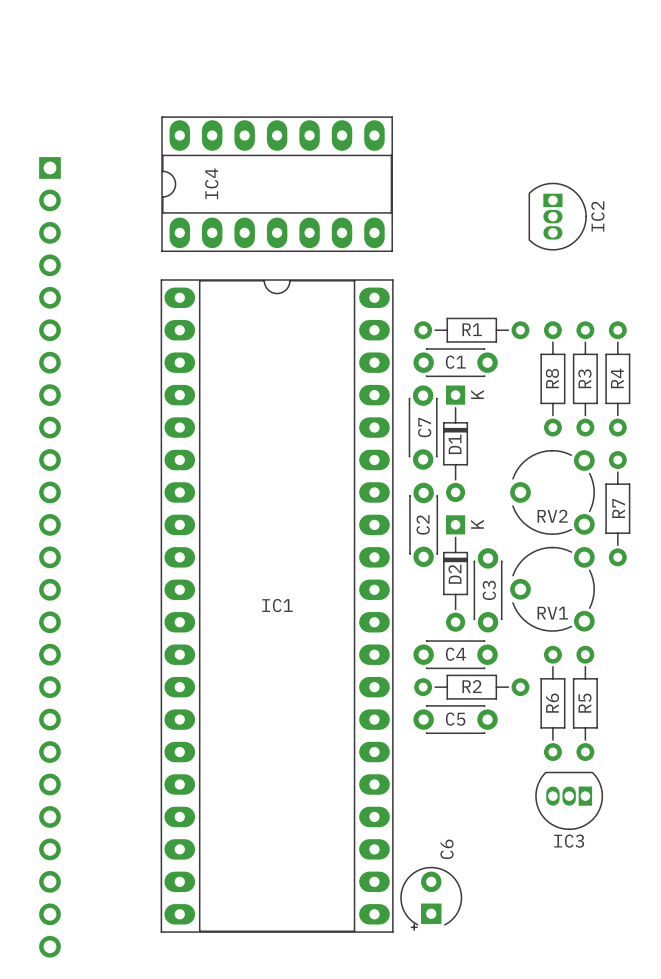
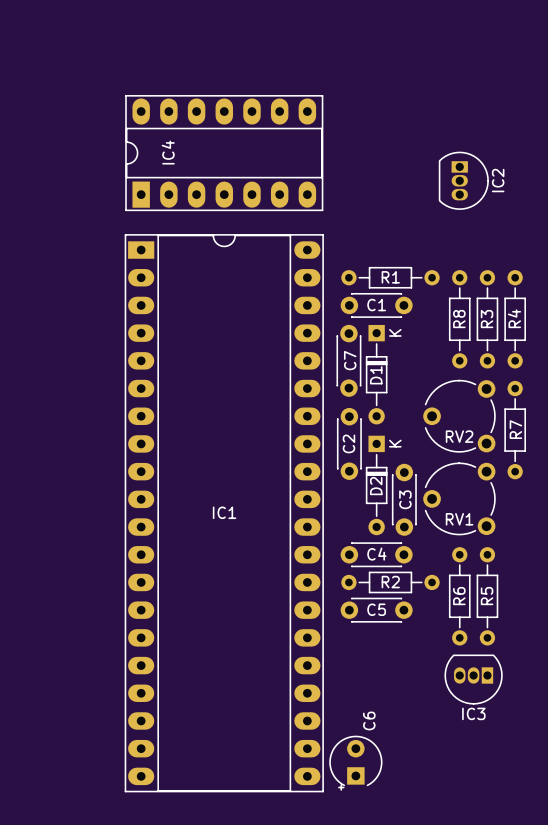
IC4 footprint: [161, 116, 393, 253] -> [125, 95, 324, 211]
IC1 footprint: [160, 279, 394, 933] -> [124, 234, 324, 793]
part: (49, 557) -> none

